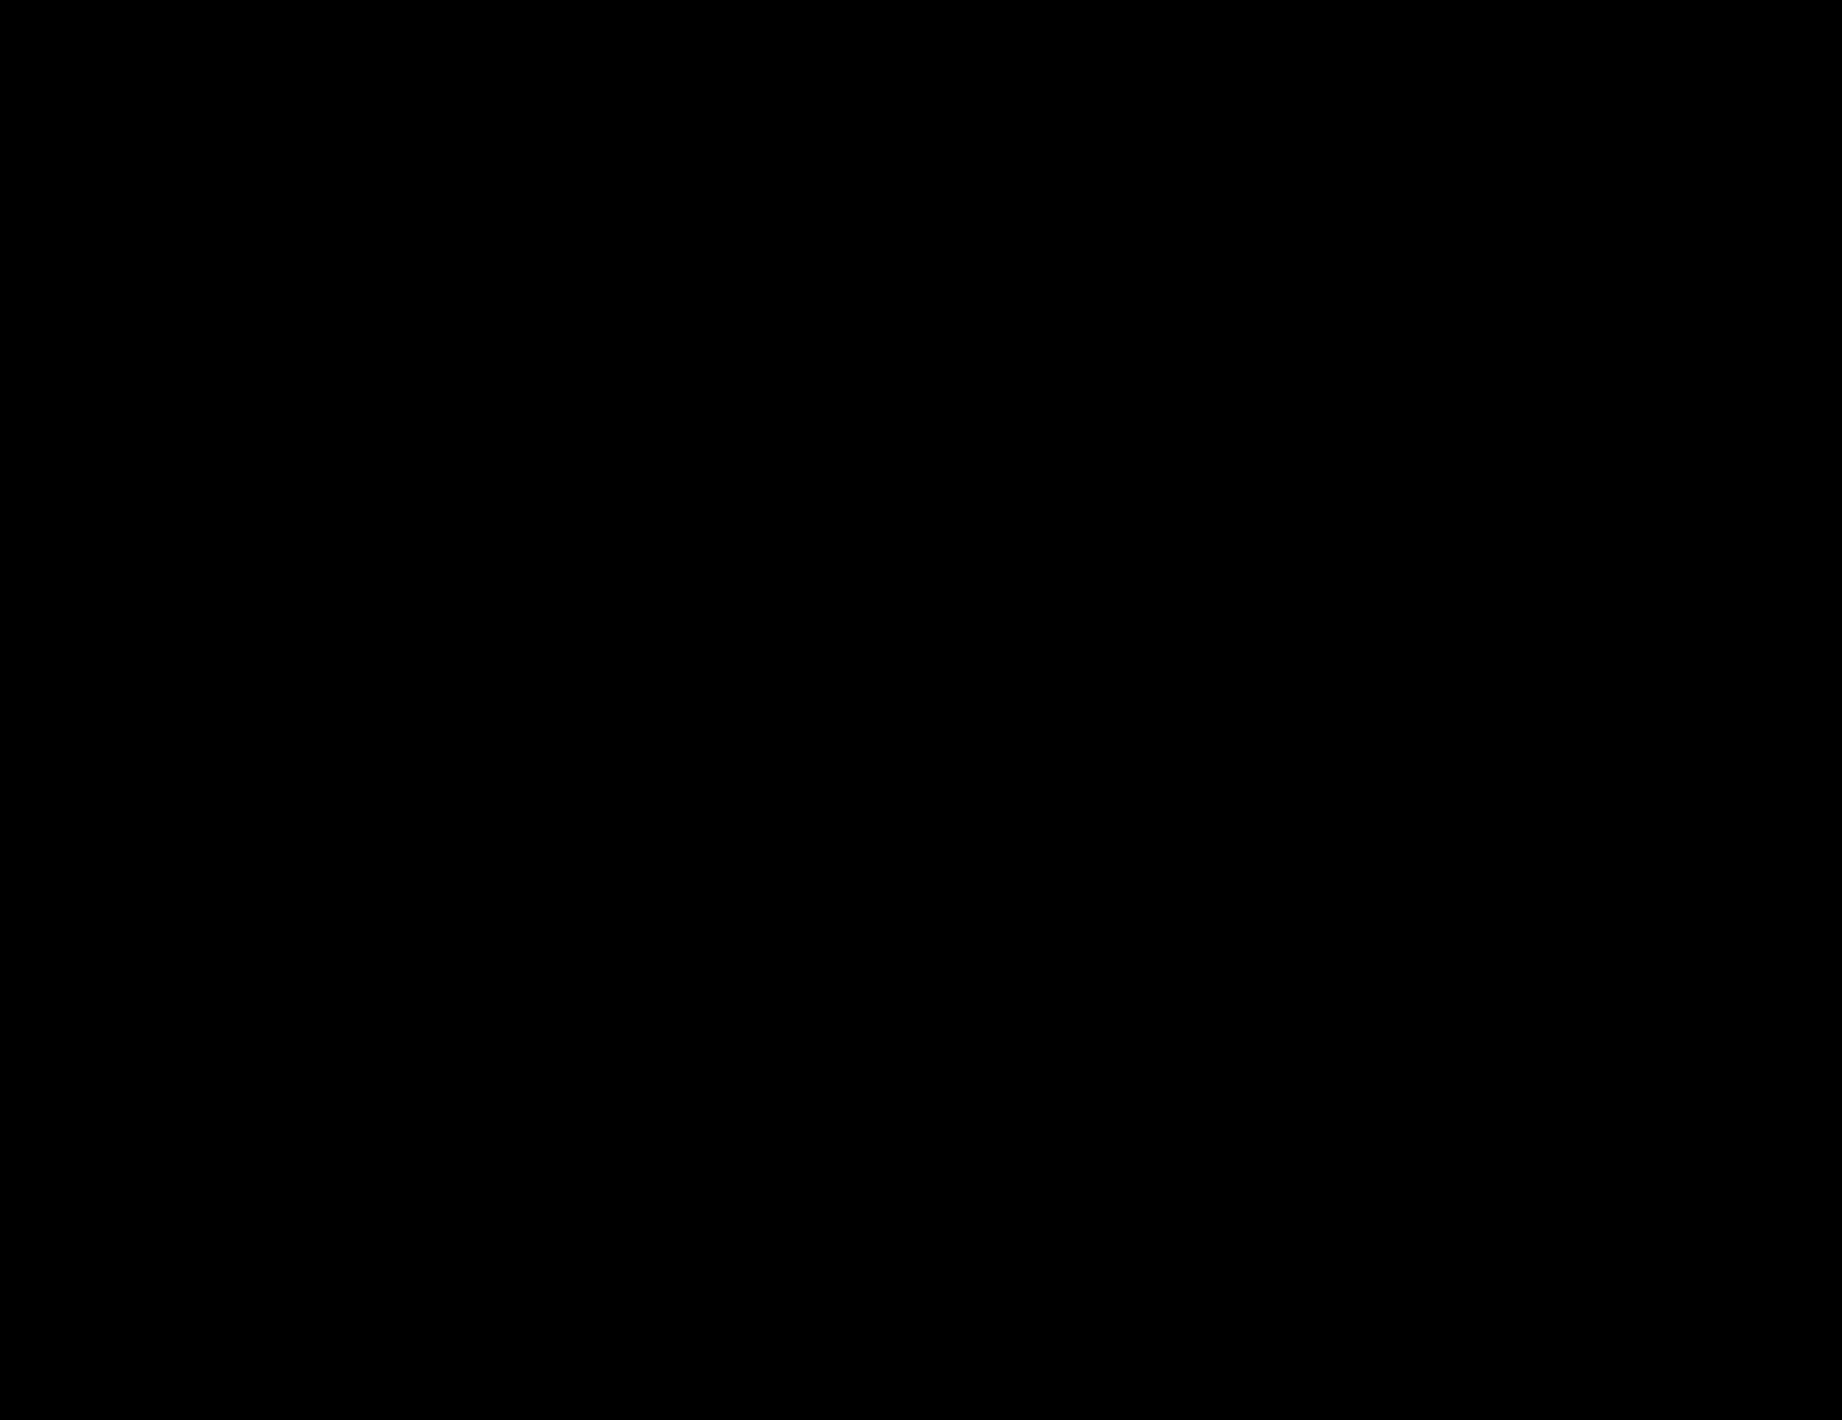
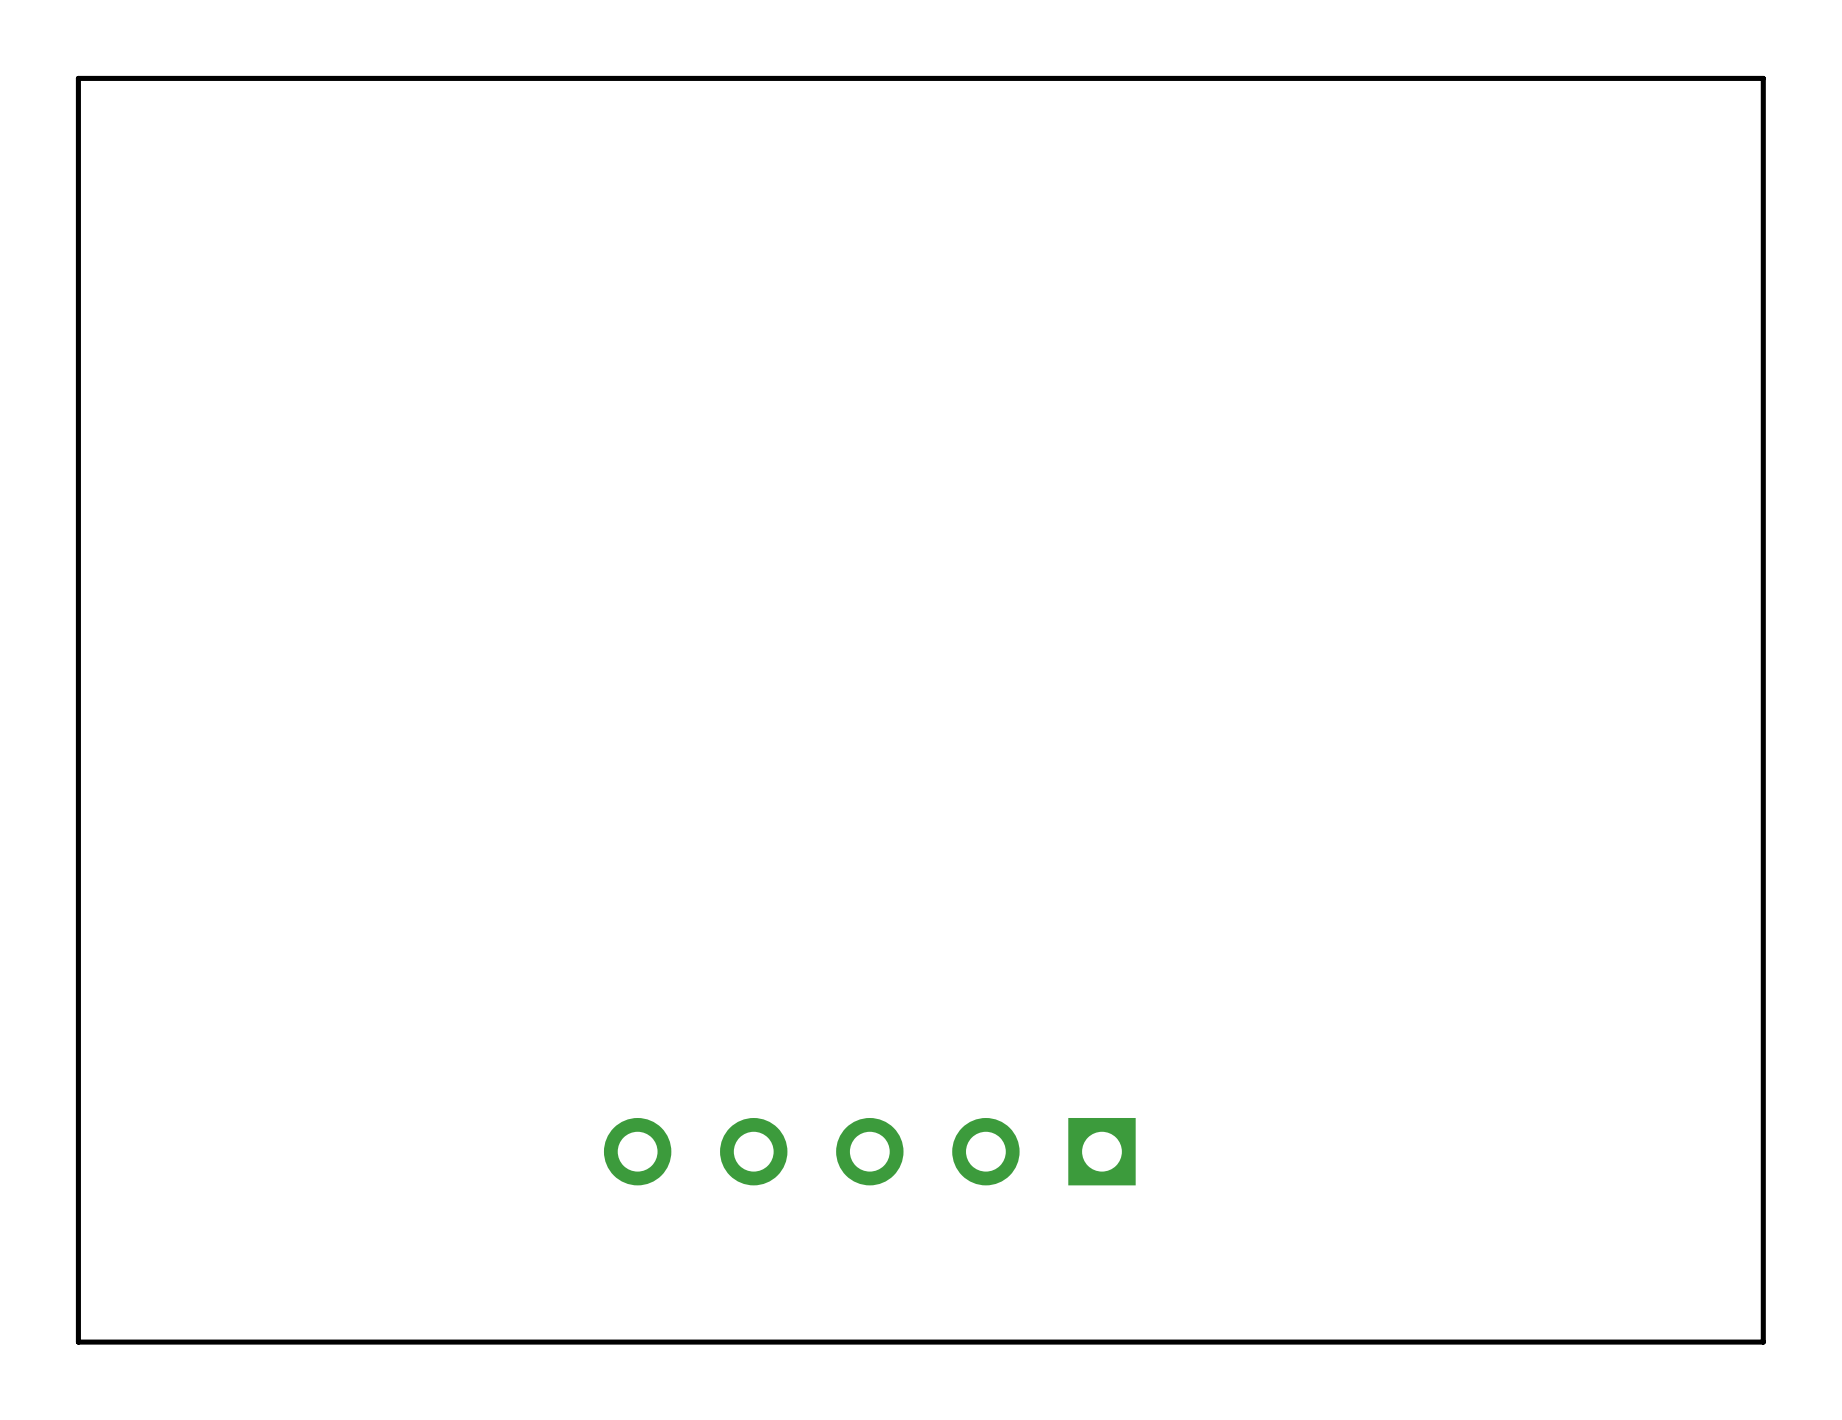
board edge: none -> (1763, 78) (78, 78) (78, 1342) (1763, 1342) (1763, 78)
part: none -> (869, 1151)

